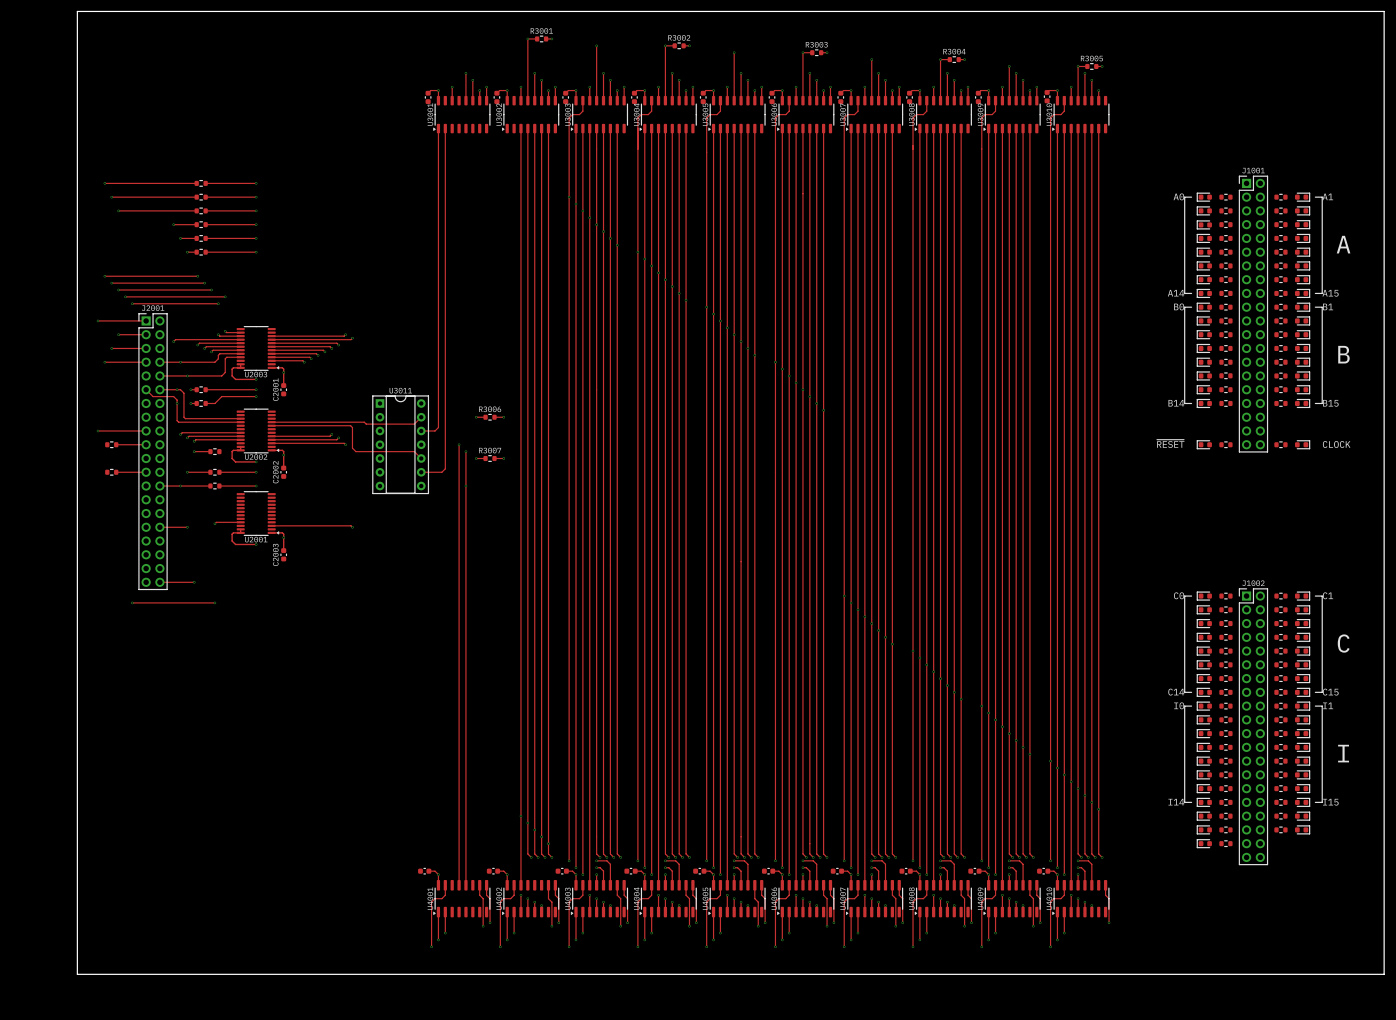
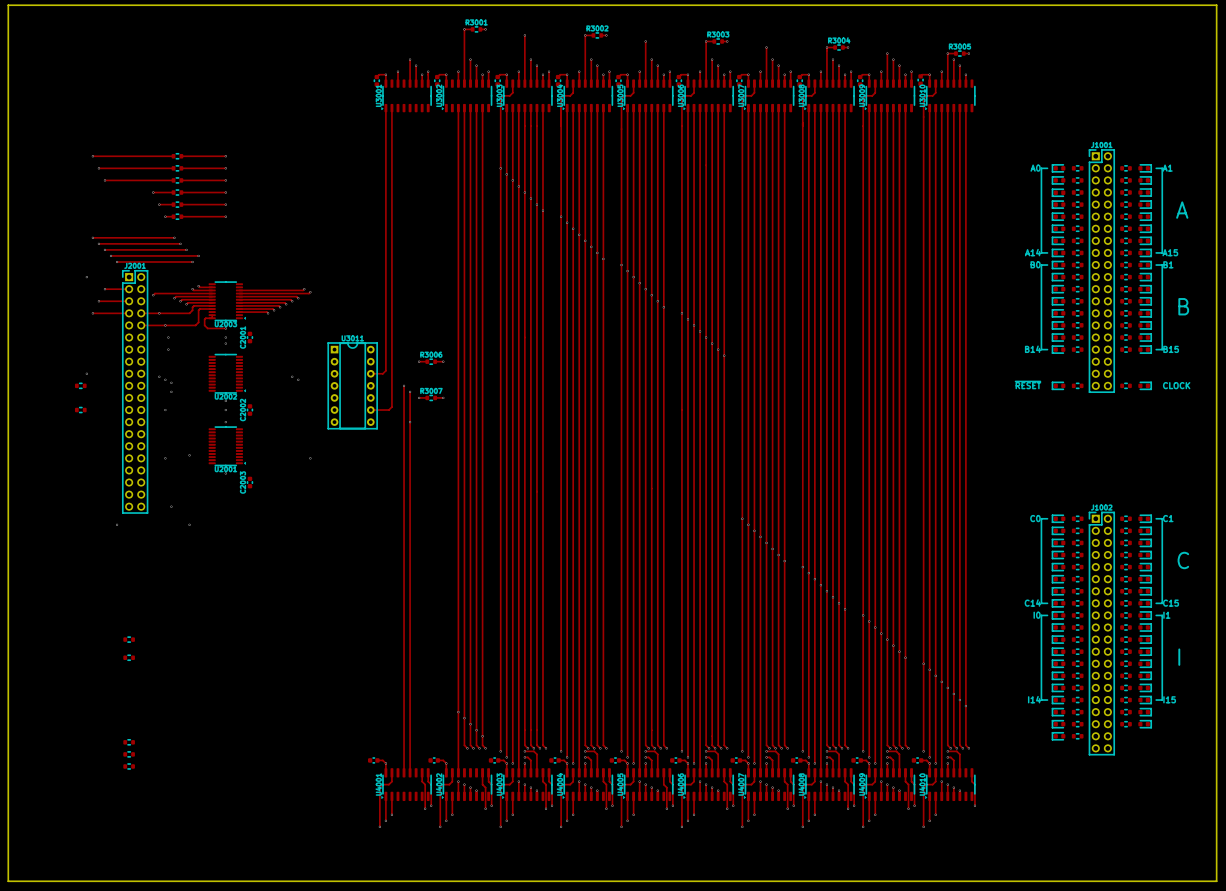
board edge: (77, 11) (77, 974) (1384, 974) -> (68, 5) (8, 5) (8, 881) (1216, 881) (1216, 851)
track: (98, 320) (146, 320) -> none
track: (271, 367) (283, 369) (283, 385) -> none
via: (283, 372) -> none
track: (146, 389) (153, 396) (173, 396) (177, 400) (178, 422) (240, 422) -> none
track: (159, 389) (180, 389) (183, 393) (185, 418) (240, 418) -> none
via: (177, 389) -> none
track: (190, 389) (196, 389) -> none
part: (201, 389) -> none
track: (205, 389) (256, 389) -> none
track: (256, 396) (221, 396) (214, 403) (205, 403) -> none
via: (177, 403) -> none
track: (190, 403) (196, 403) -> none
part: (201, 403) -> none
track: (421, 417) (414, 424) (271, 422) -> none
track: (271, 425) (350, 425) (352, 427) (352, 448) (355, 451) (414, 451) (421, 458) -> none
track: (98, 430) (146, 430) -> none
track: (240, 432) (182, 432) (180, 434) -> none
track: (331, 434) (330, 436) (271, 436) -> none
track: (240, 436) (189, 436) (187, 437) -> none
track: (338, 437) (336, 439) (271, 439) -> none
track: (240, 439) (194, 441) -> none
track: (271, 443) (345, 444) -> none
part: none -> (80, 385)
part: (111, 444) -> none
track: (116, 444) (146, 444) -> none
via: (345, 444) -> none
track: (240, 446) (240, 450) (232, 451) (232, 458) (235, 461) (256, 461) -> none
track: (271, 450) (283, 451) (283, 468) -> none
track: (194, 451) (210, 451) -> none
part: (214, 451) -> none
via: (283, 455) -> none
part: none -> (80, 410)
part: (111, 472) -> none
track: (116, 472) (146, 472) -> none
track: (187, 472) (210, 472) -> none
part: (214, 472) -> none
track: (219, 472) (256, 472) -> none
track: (159, 486) (210, 486) -> none
via: (180, 486) -> none
part: (214, 486) -> none
track: (219, 486) (256, 486) -> none
track: (240, 522) (214, 523) -> none
track: (271, 525) (352, 527) -> none
track: (159, 527) (187, 527) -> none
track: (240, 529) (240, 532) (232, 534) (232, 541) (235, 544) (256, 544) -> none
track: (271, 532) (283, 534) (283, 550) -> none
via: (283, 537) -> none
track: (159, 582) (194, 582) -> none
track: (132, 602) (214, 602) -> none
part: none -> (129, 639)
part: none -> (129, 657)
part: none -> (129, 742)
part: none -> (129, 754)
part: none -> (129, 766)

